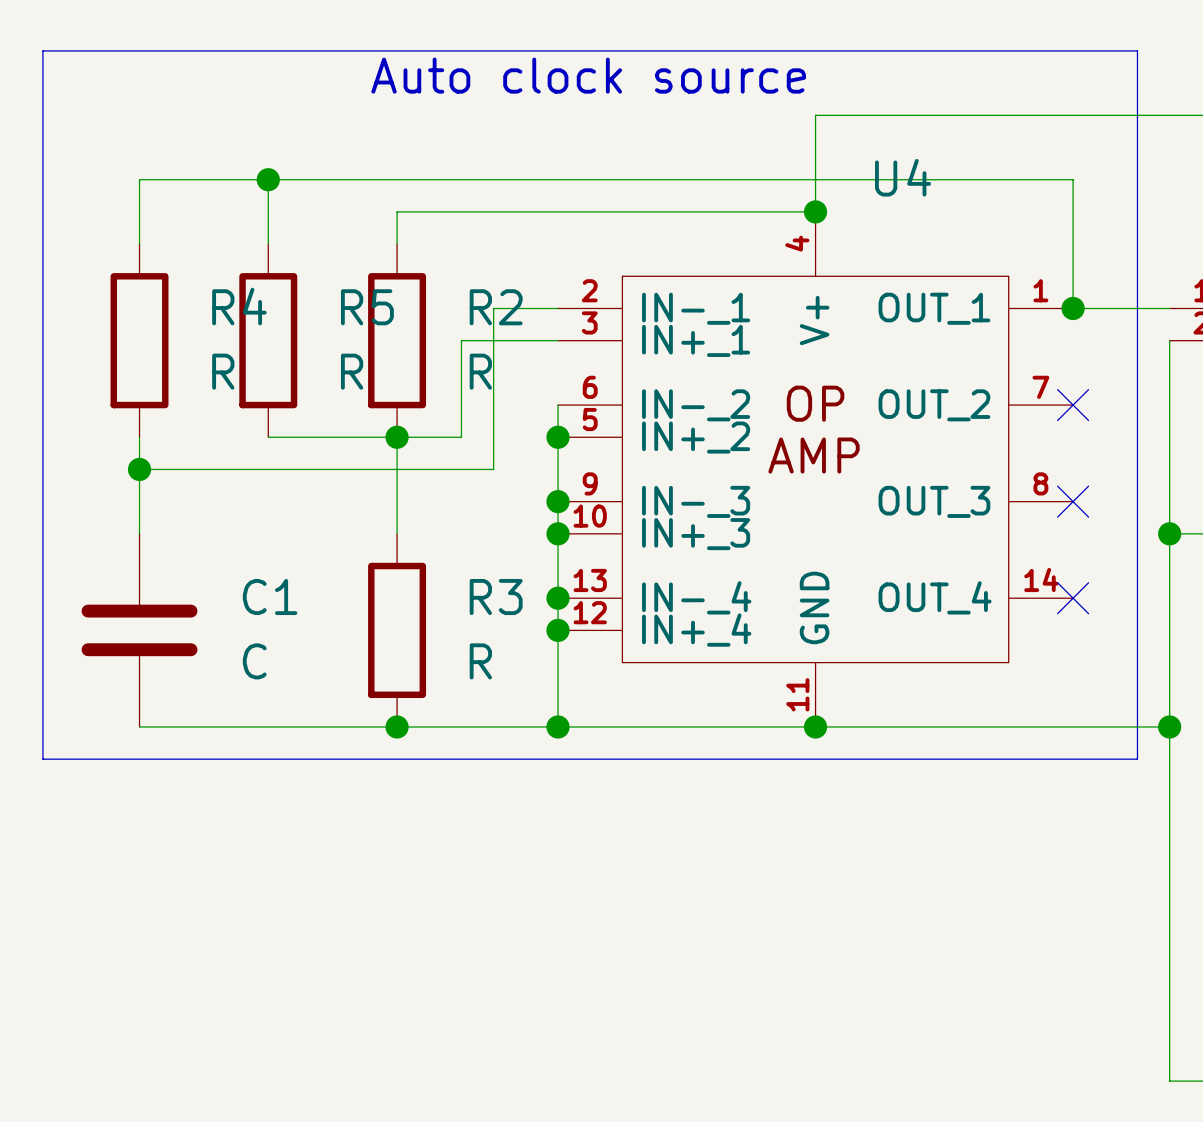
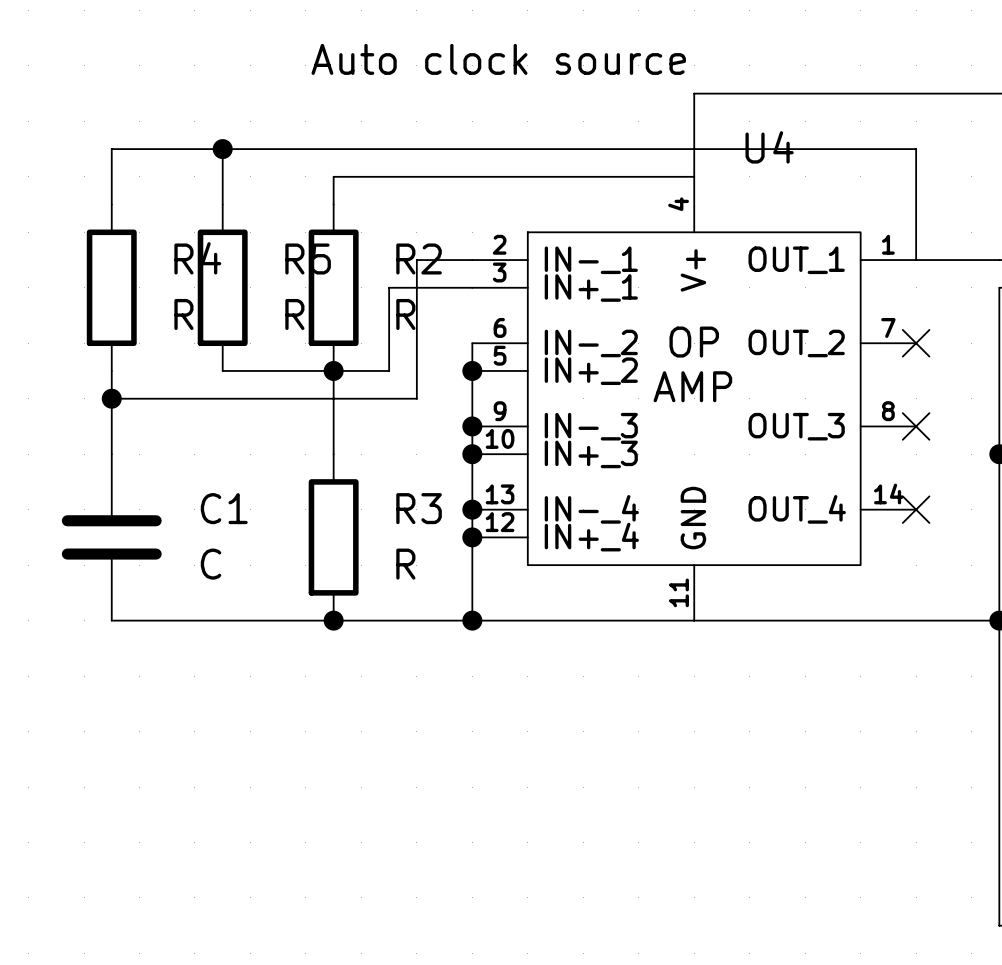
line: (42, 50) (1137, 50) (1137, 759) (42, 759) (42, 50) -> none
junction: (815, 211) -> none
junction: (1073, 308) -> none
junction: (815, 726) -> none

